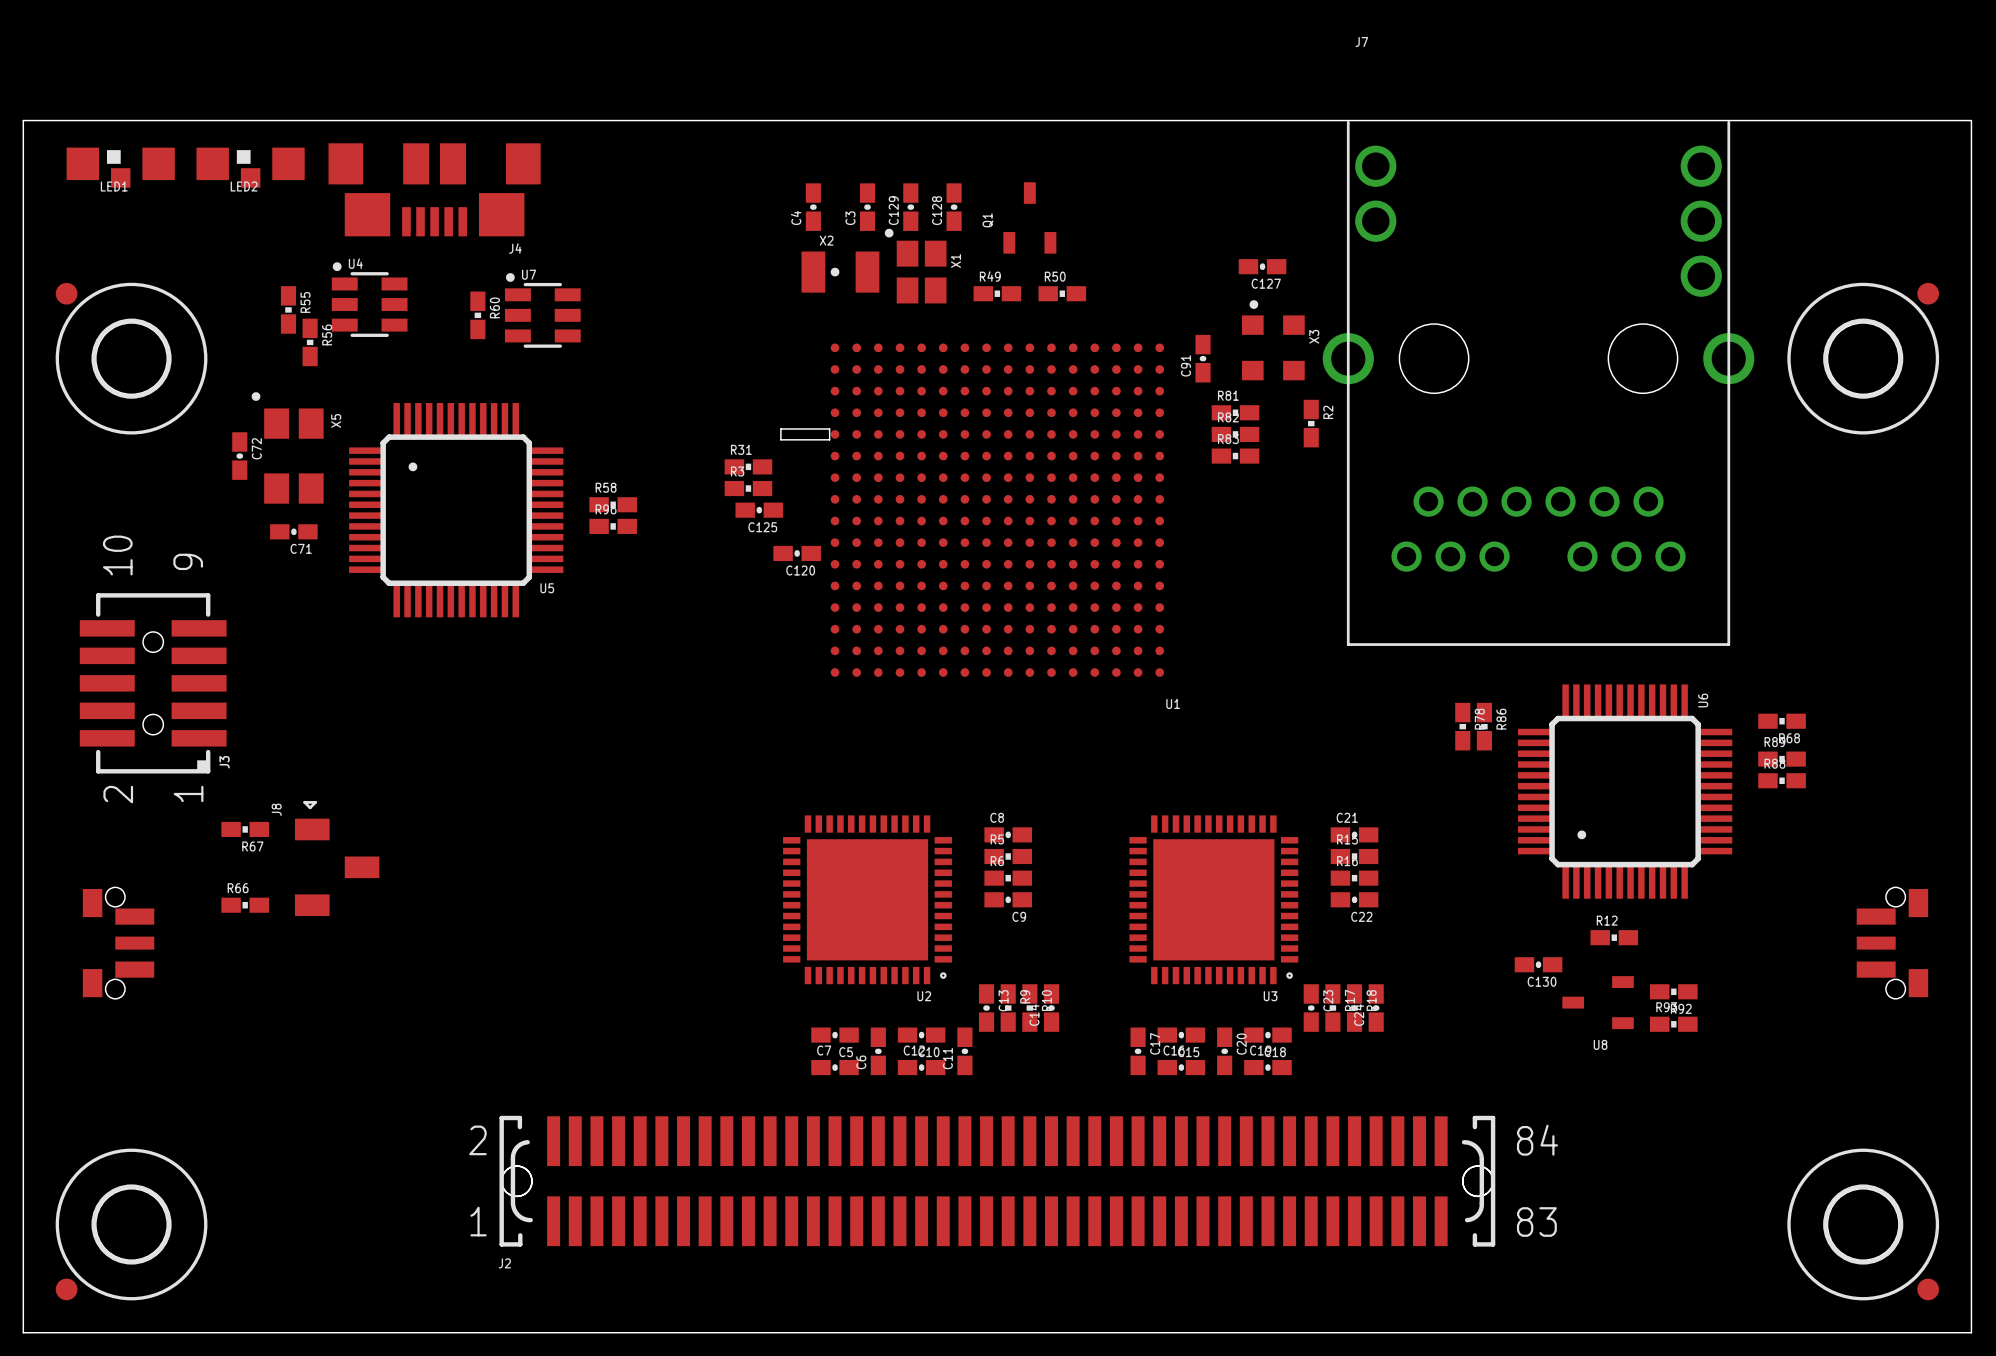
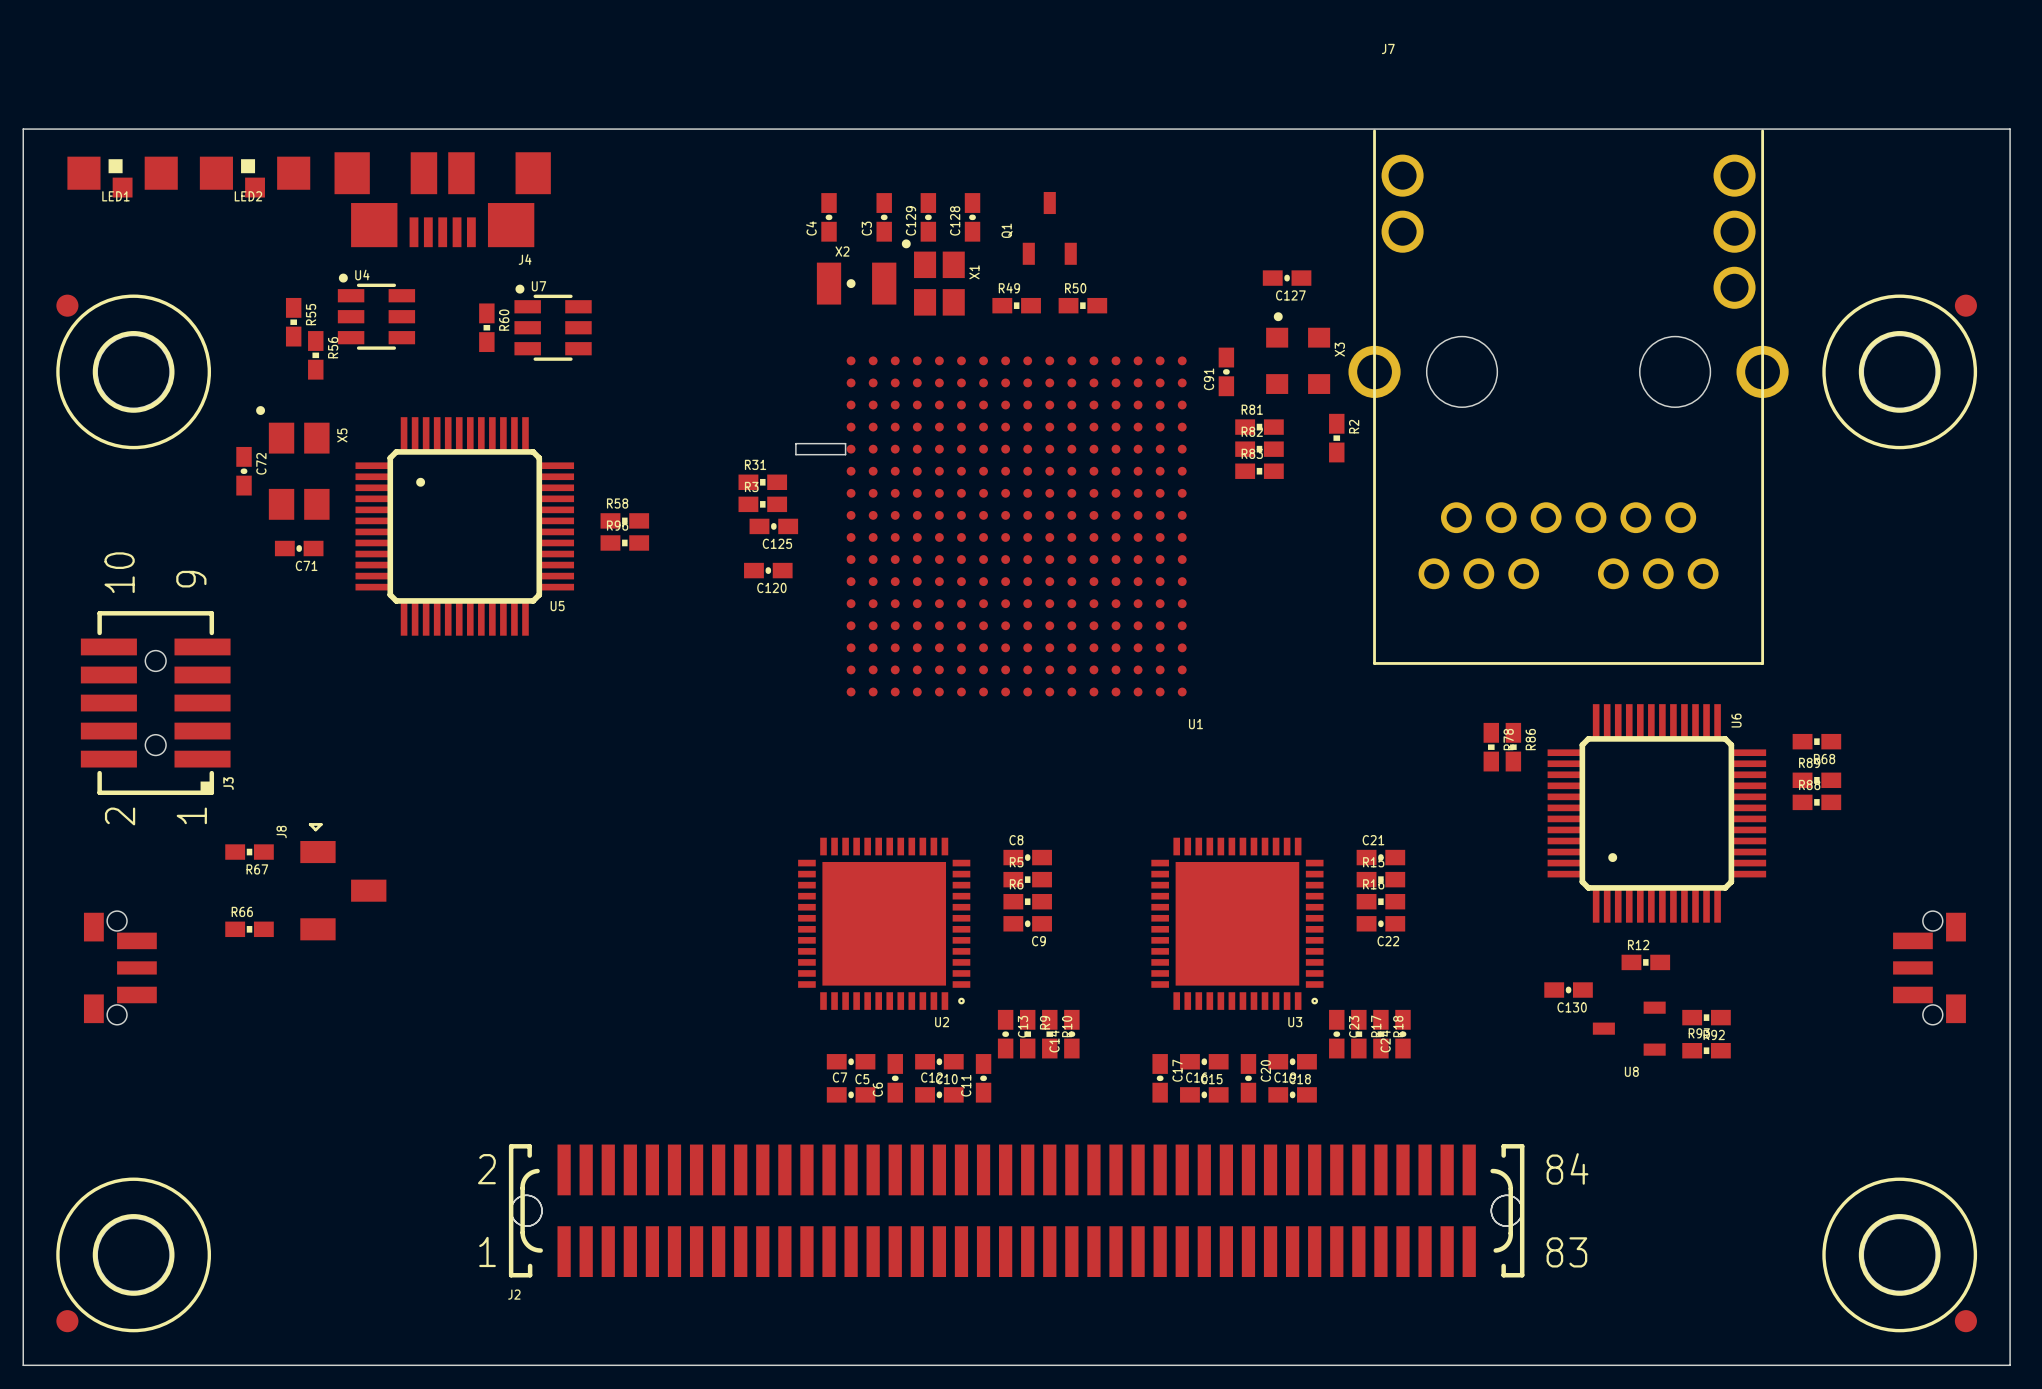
C120 position: (797, 553) -> (768, 570)

